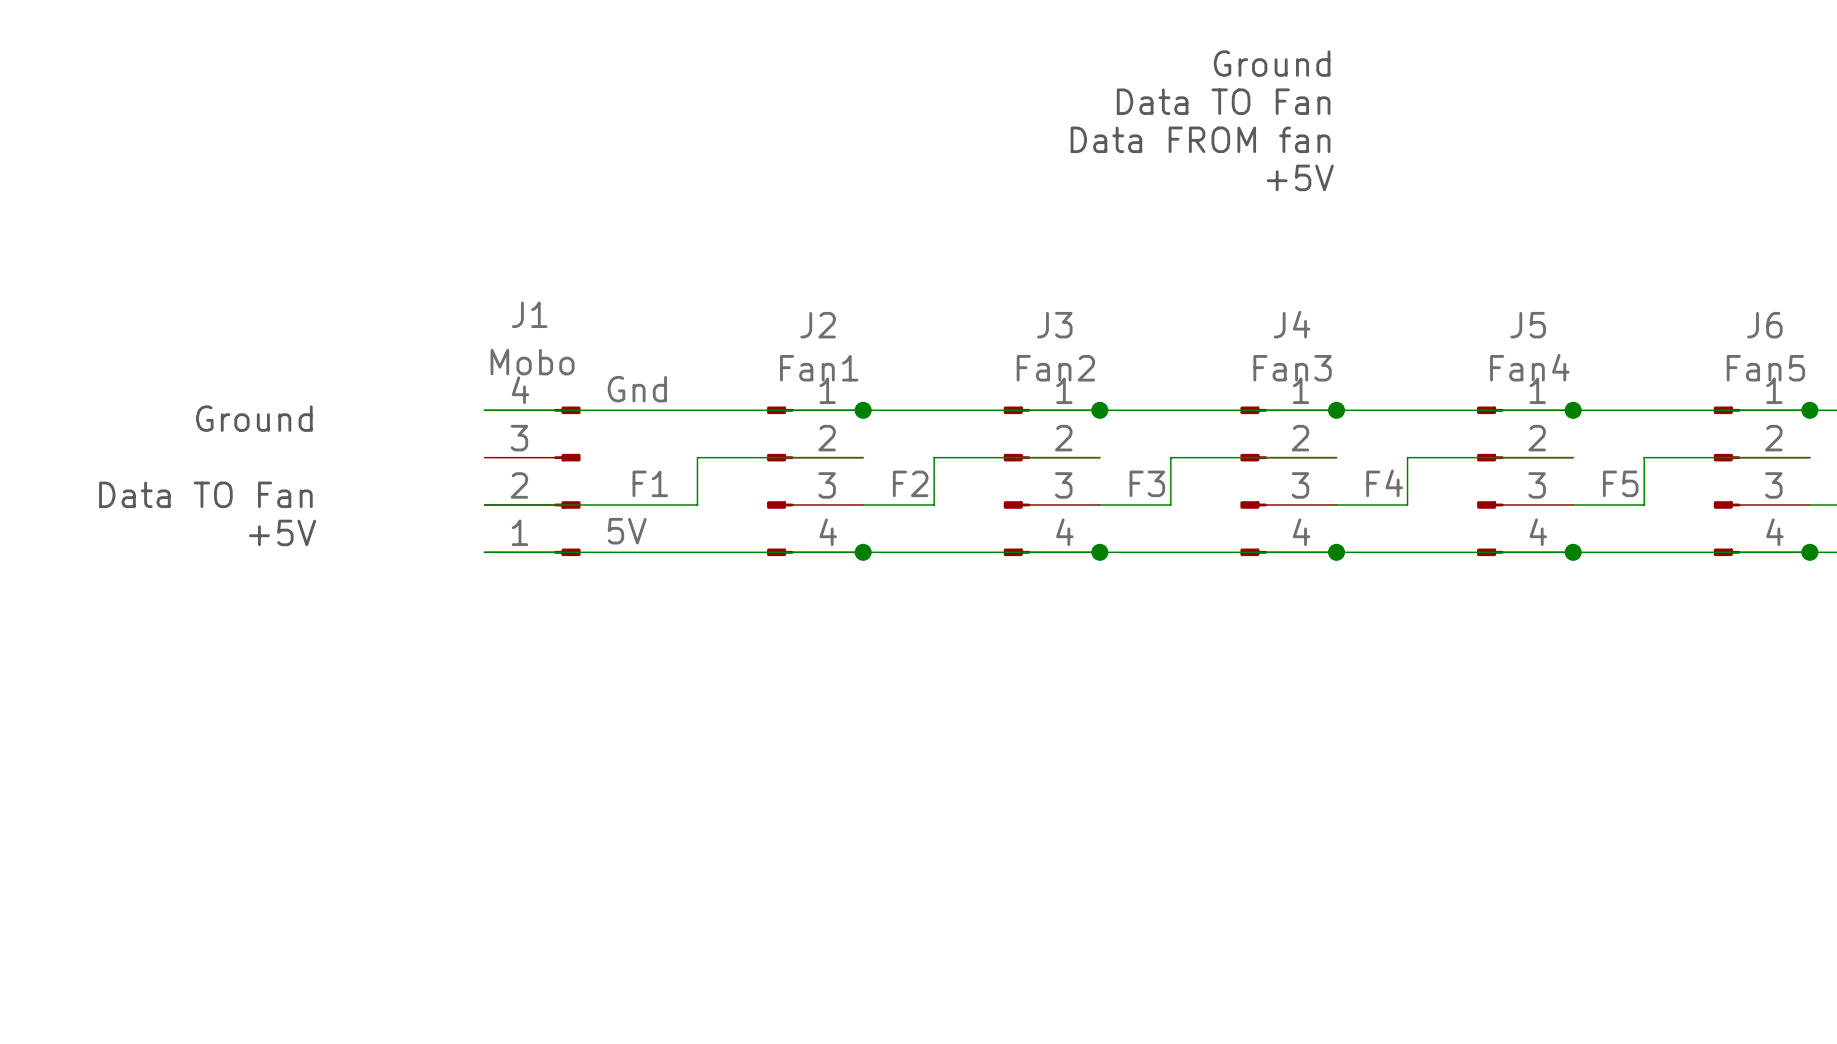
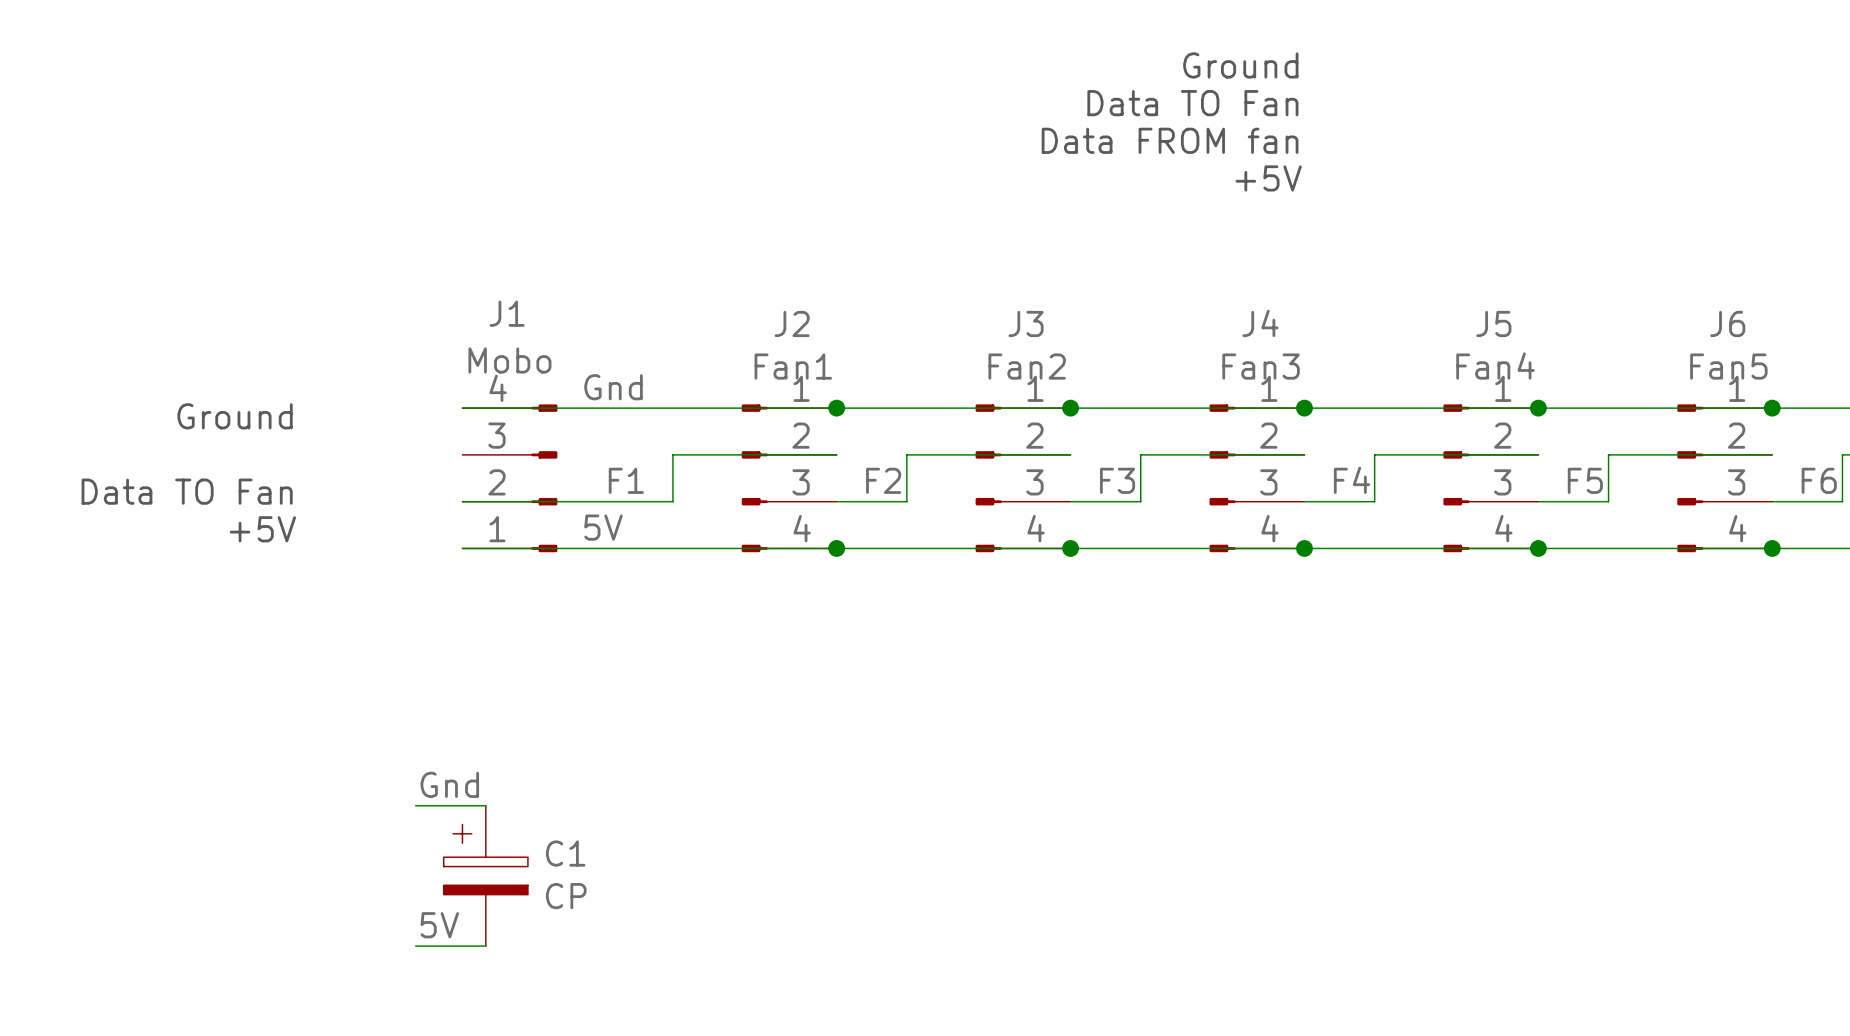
label: none -> Gnd (449, 784)
wire: none -> (415, 805) (485, 805)
C1: none -> CP (485, 875)
label: none -> 5V (439, 925)
wire: none -> (415, 946) (485, 946)

